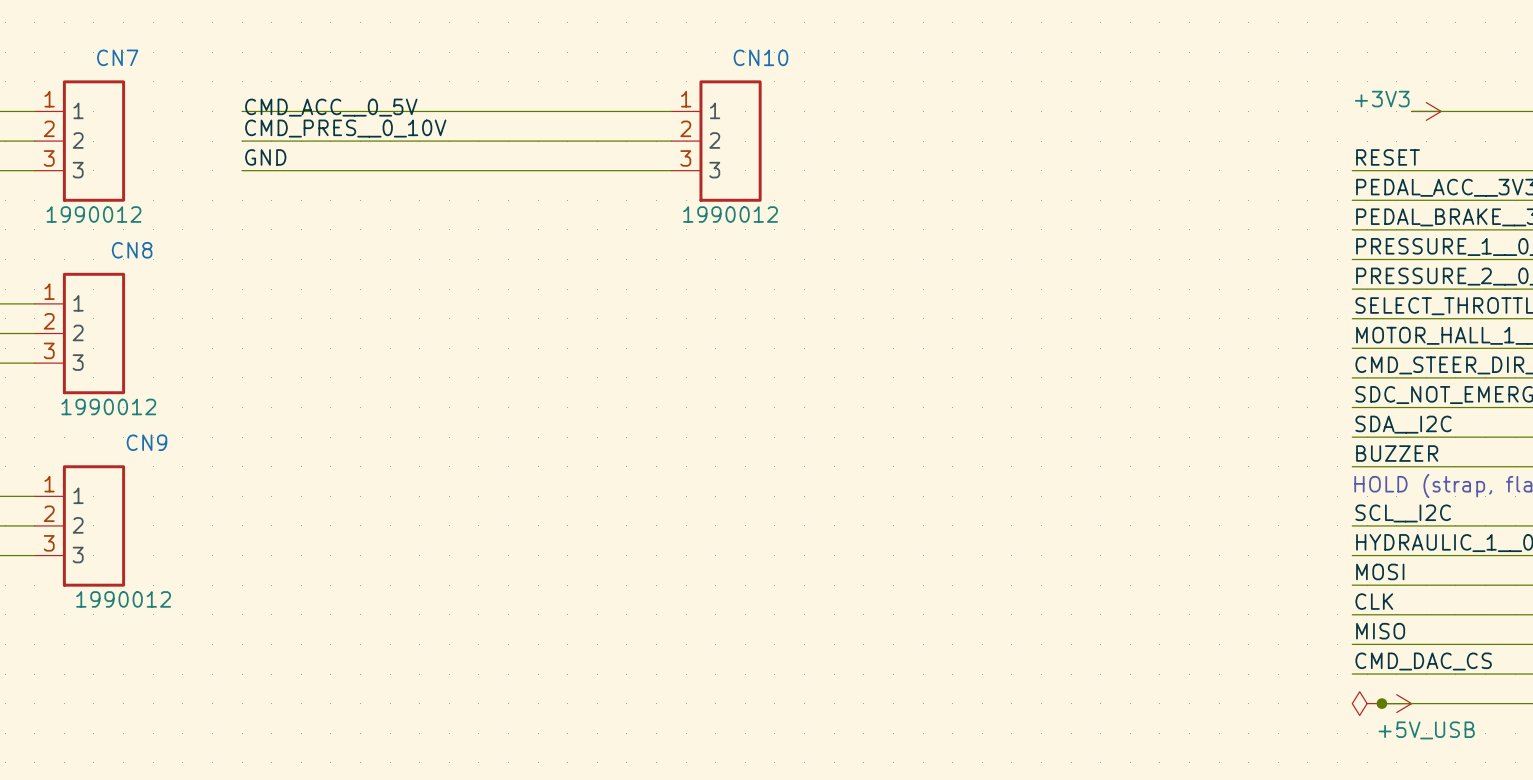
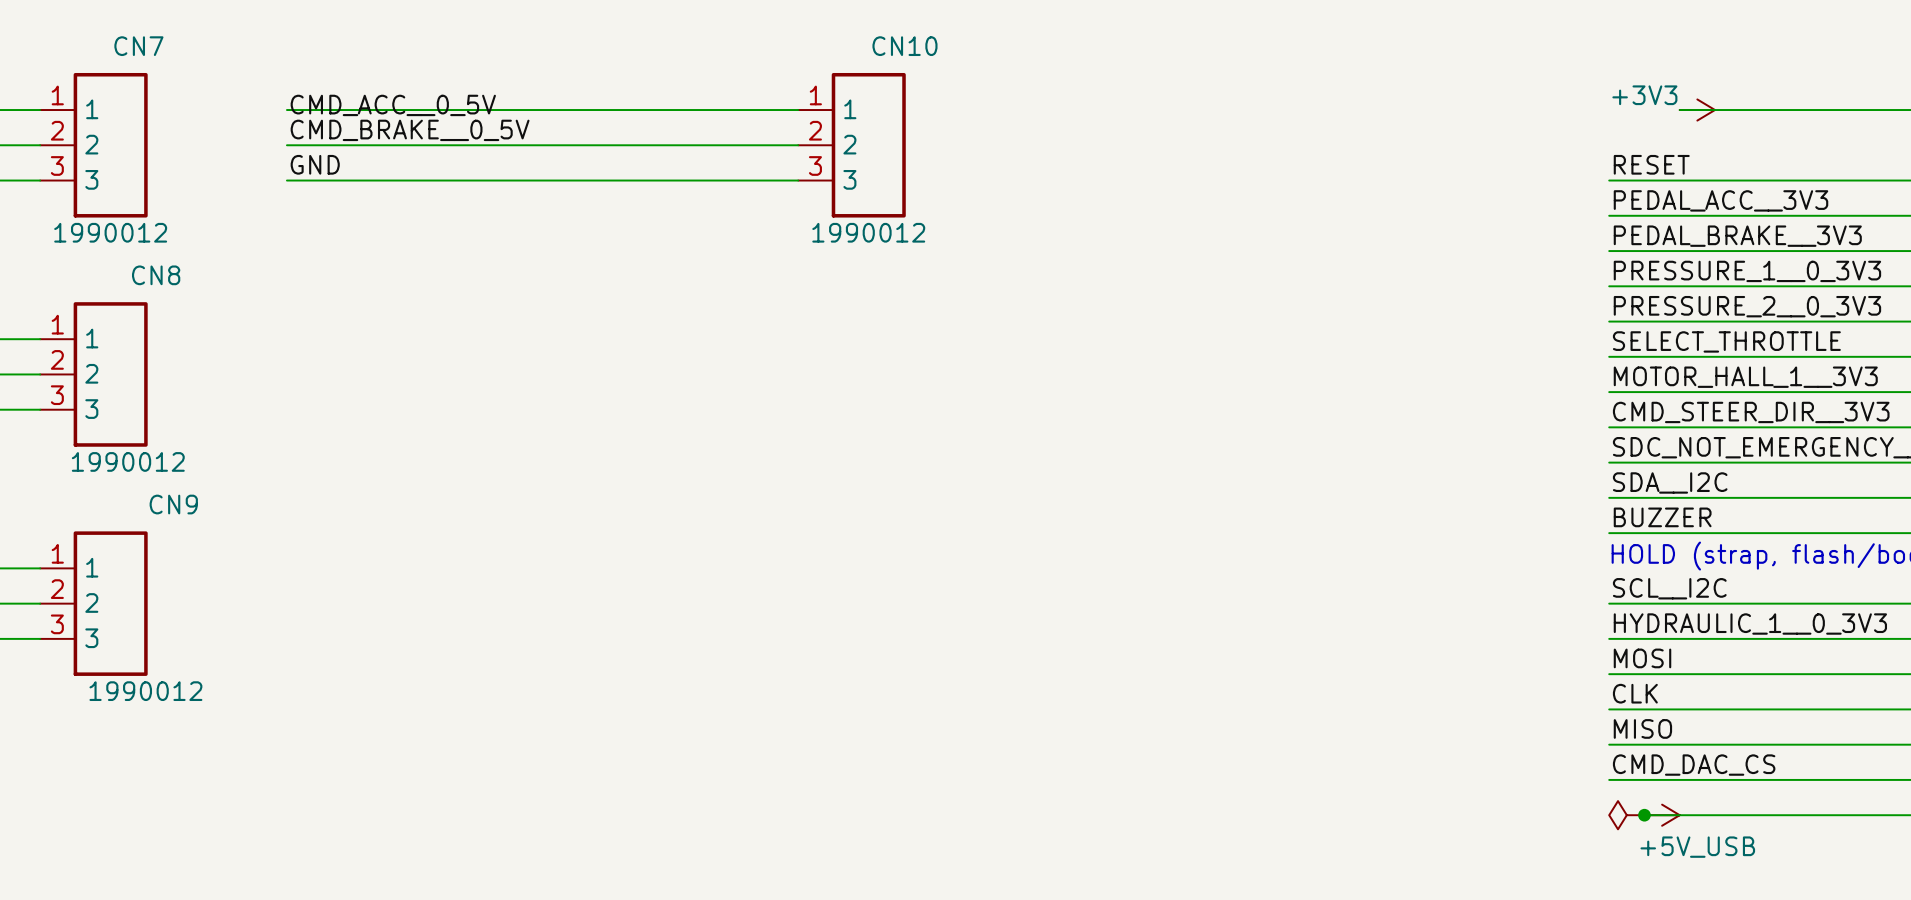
label: CMD_PRES__0_10V (345, 128) -> CMD_BRAKE__0_5V (410, 130)

